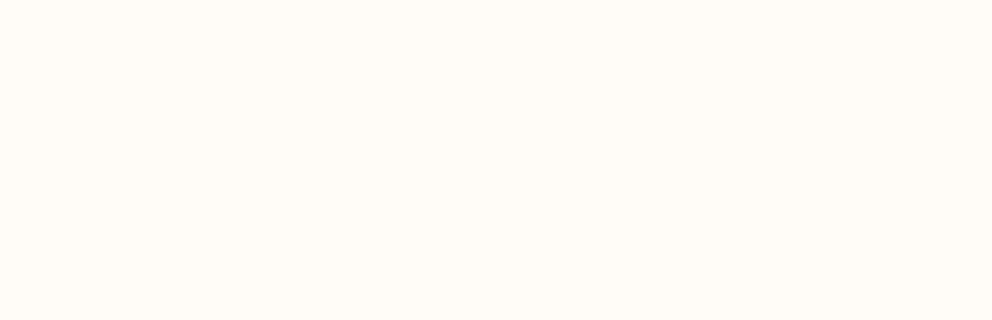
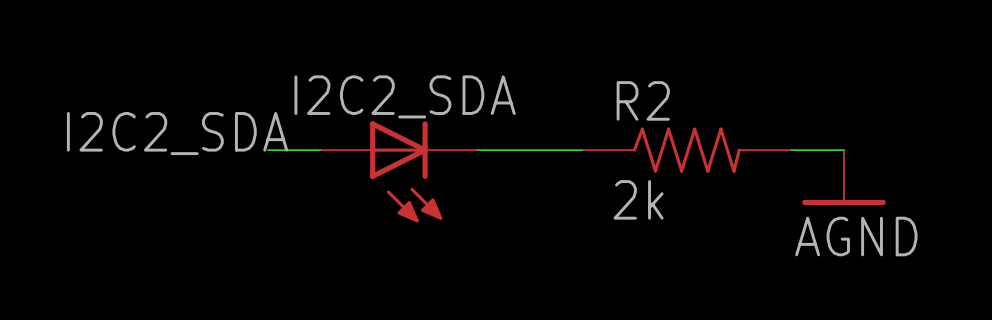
label: none -> I2C2_SDA (177, 133)
wire: none -> (268, 150) (320, 150)
wire: none -> (477, 150) (582, 150)
R2: none -> 2k (686, 150)
wire: none -> (791, 150) (843, 150)
I2C2_SDA: none -> (398, 171)
power symbol: none -> AGND (843, 177)

